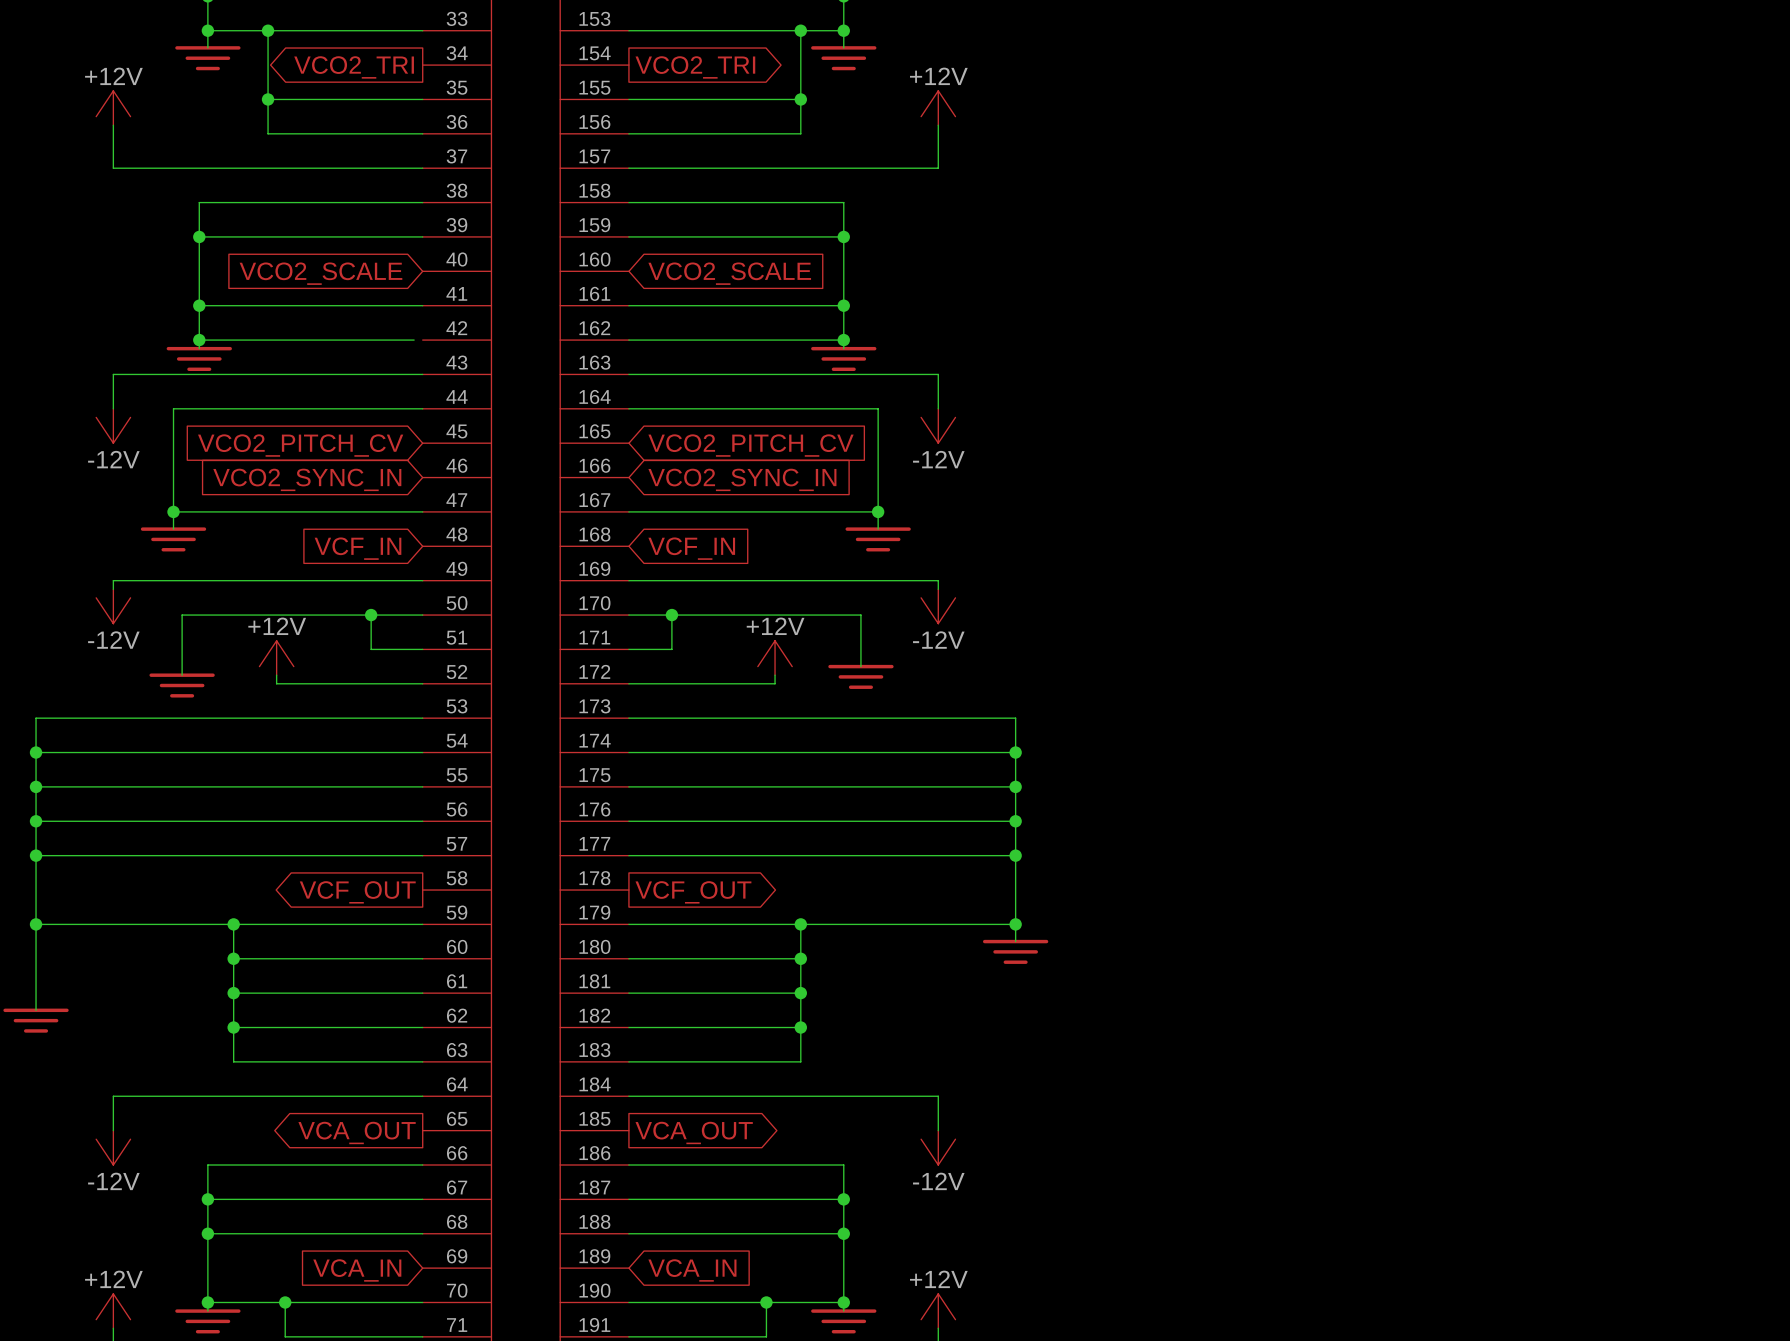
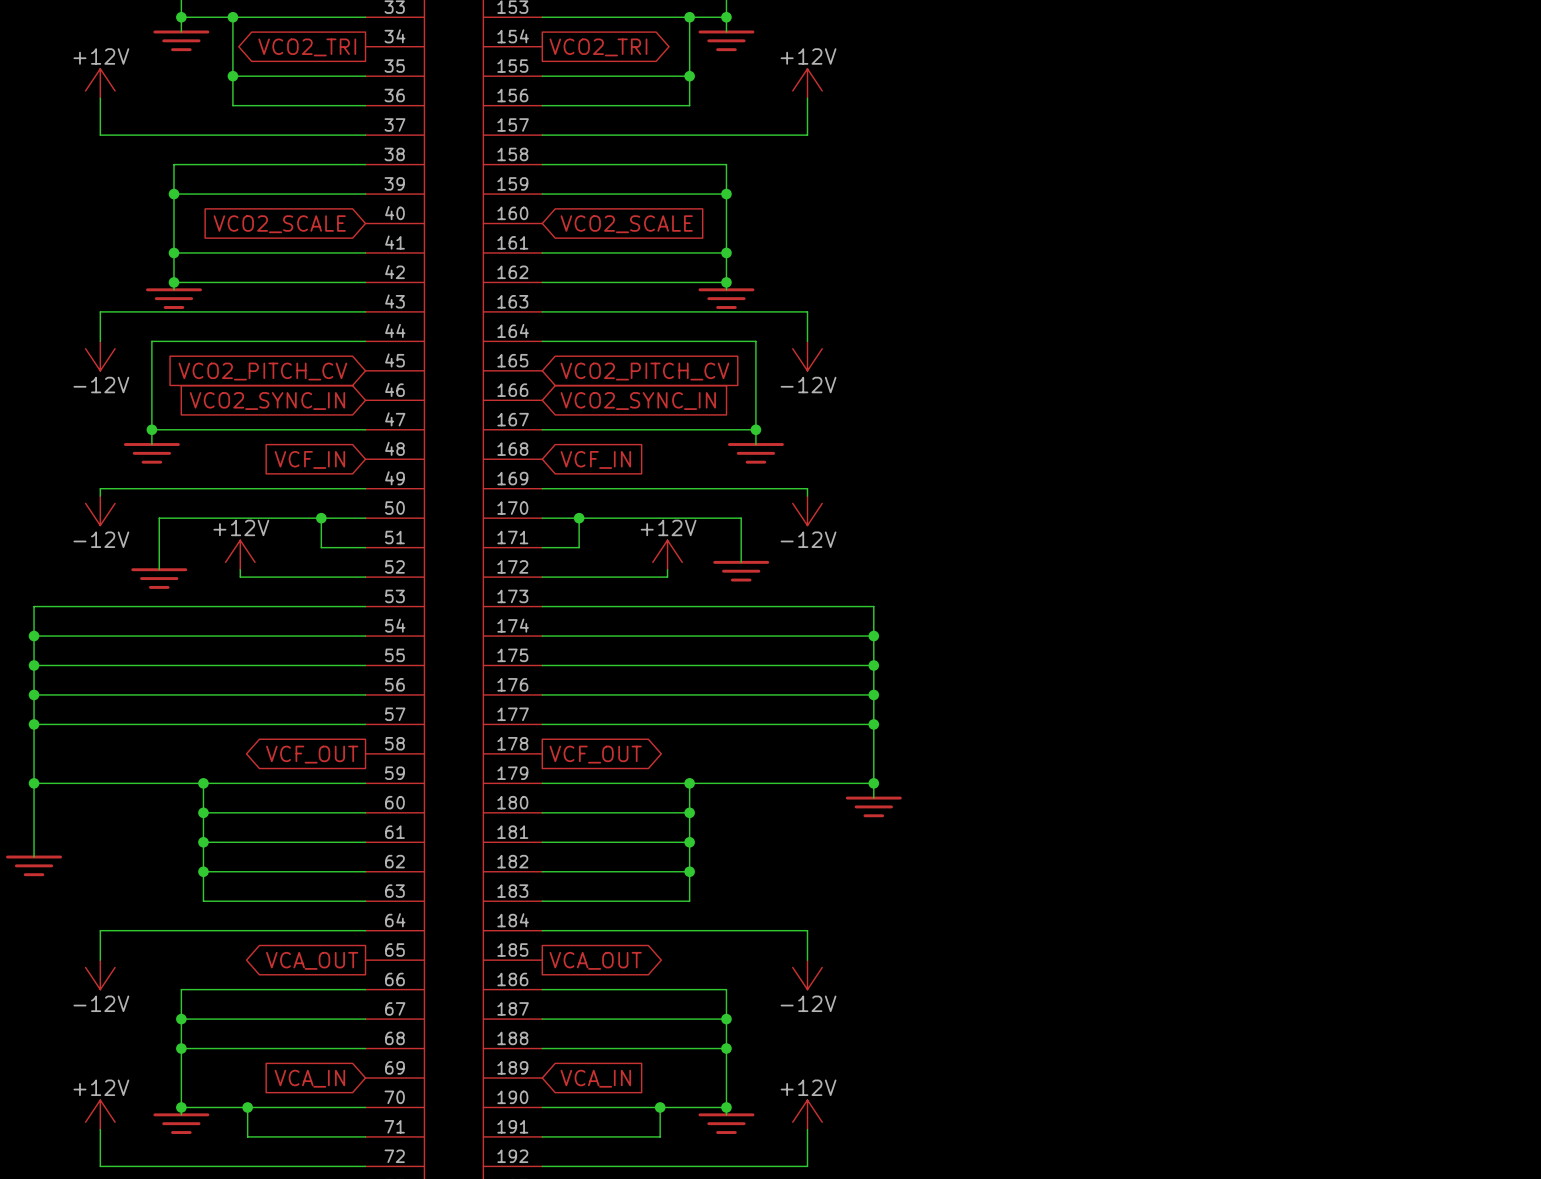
wire: none -> (358, 282) (365, 282)

